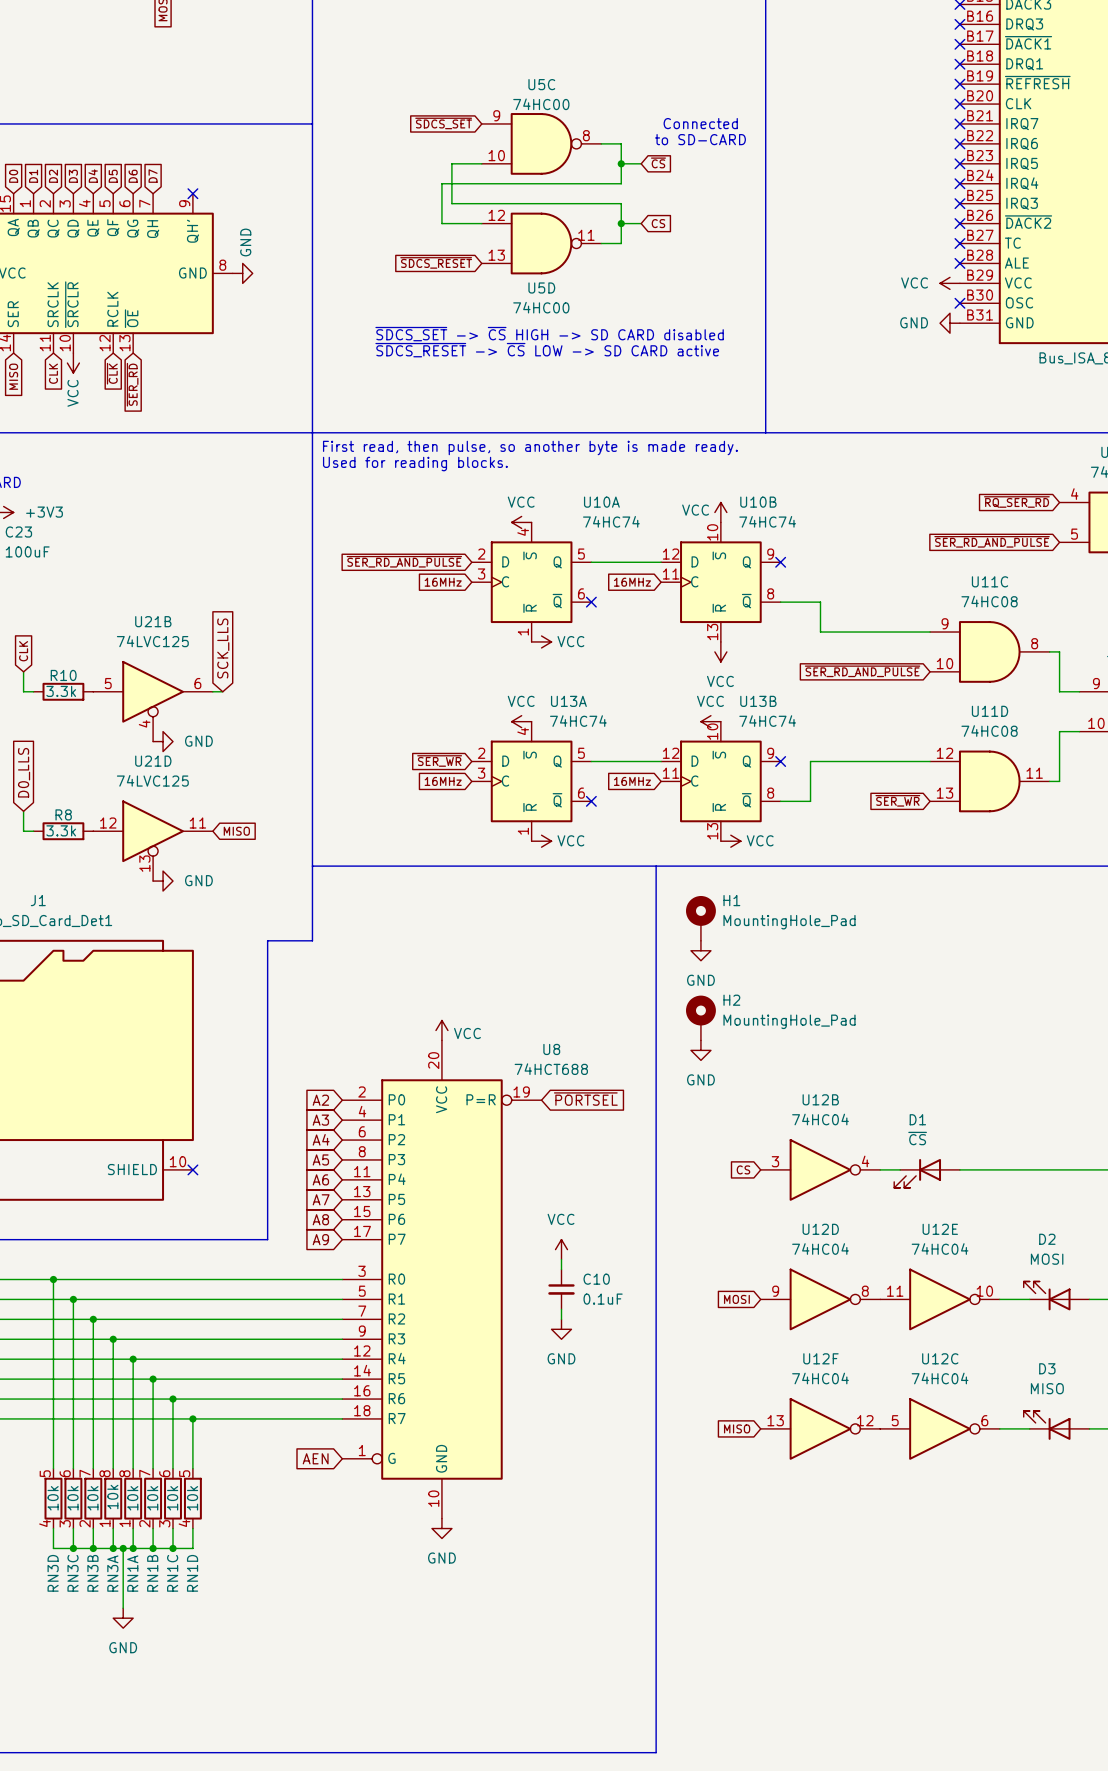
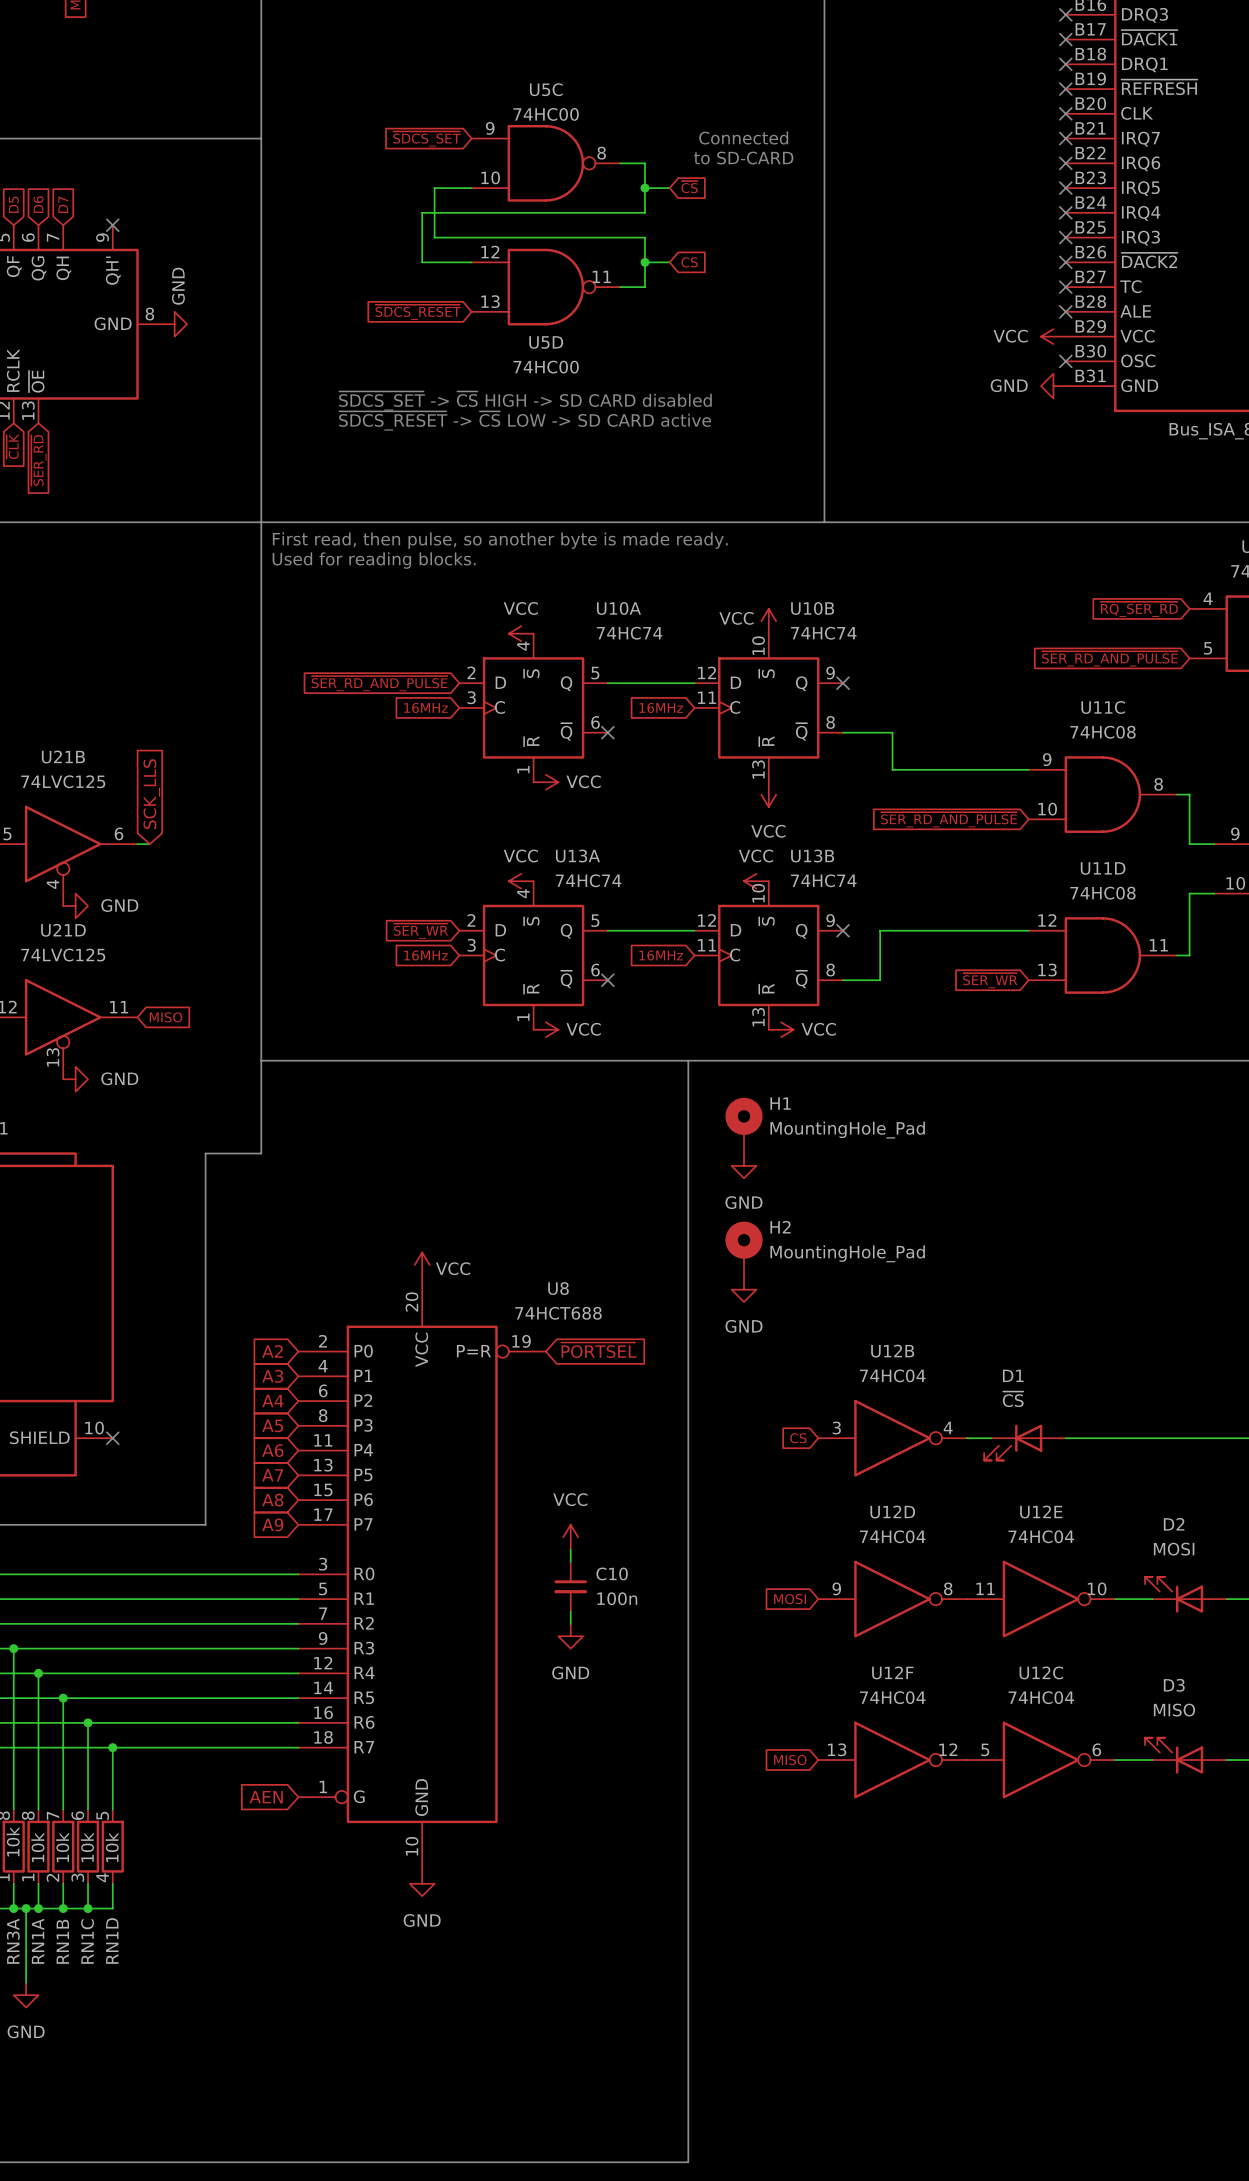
C10 value: 0.1uF (603, 1299) -> 100n (617, 1598)

